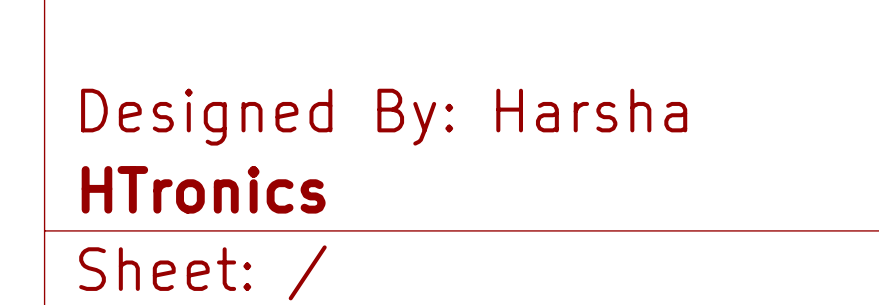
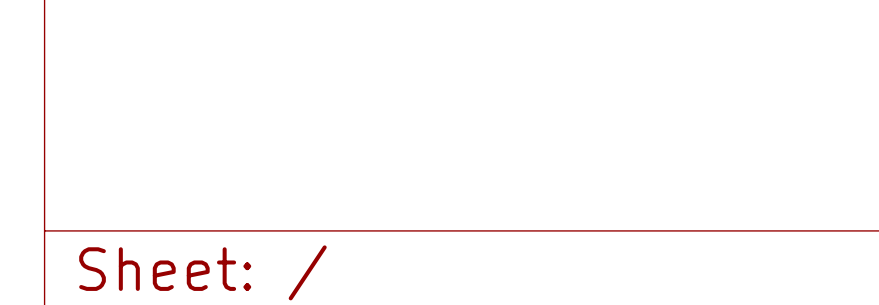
title block: Designed By: Harsha (384, 117) -> none
title block: HTronics (203, 189) -> none

